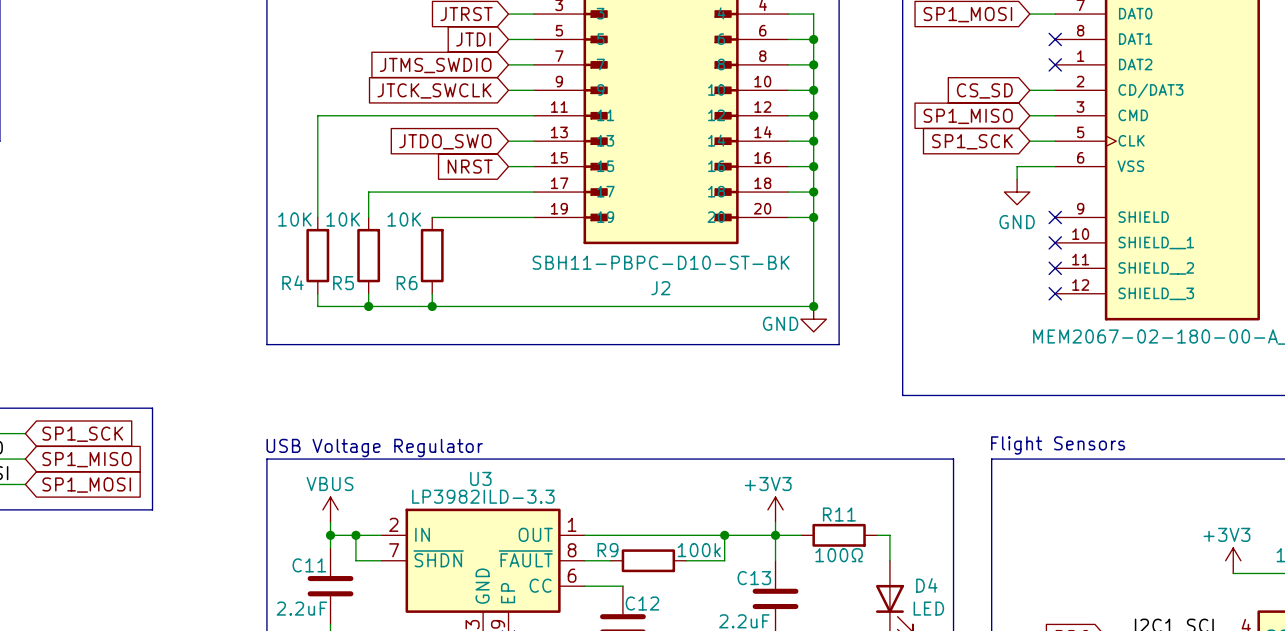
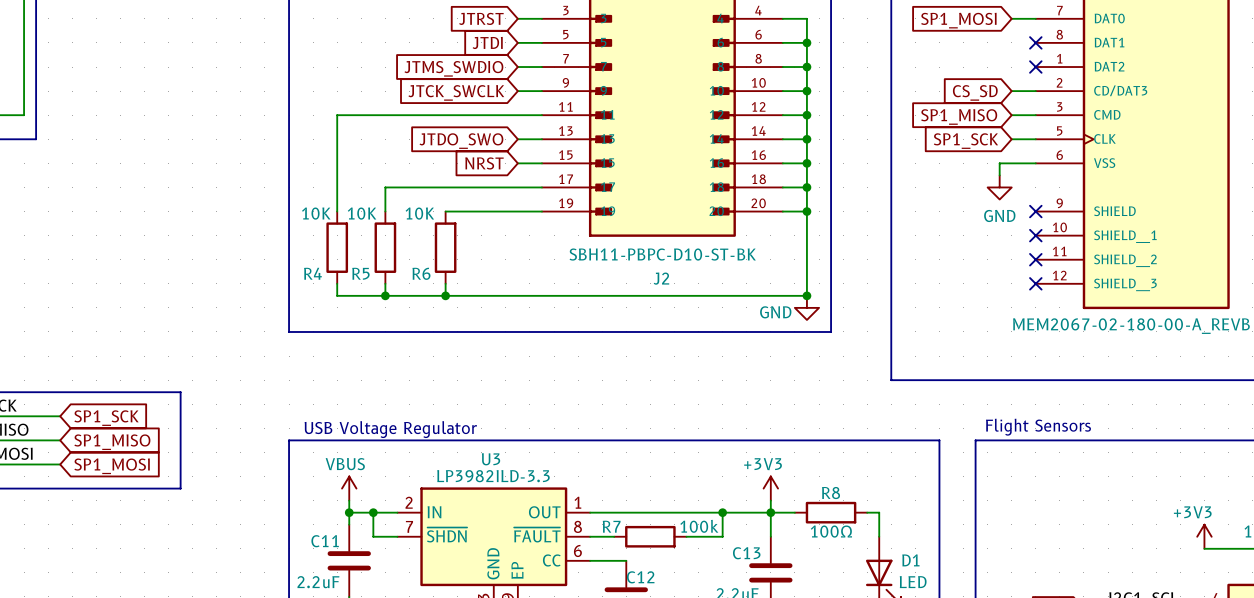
R11 name: R11 (839, 514) -> R8 (830, 493)
R9 name: R9 (607, 550) -> R7 (611, 526)
D4 name: D4 (926, 585) -> D1 (910, 560)

